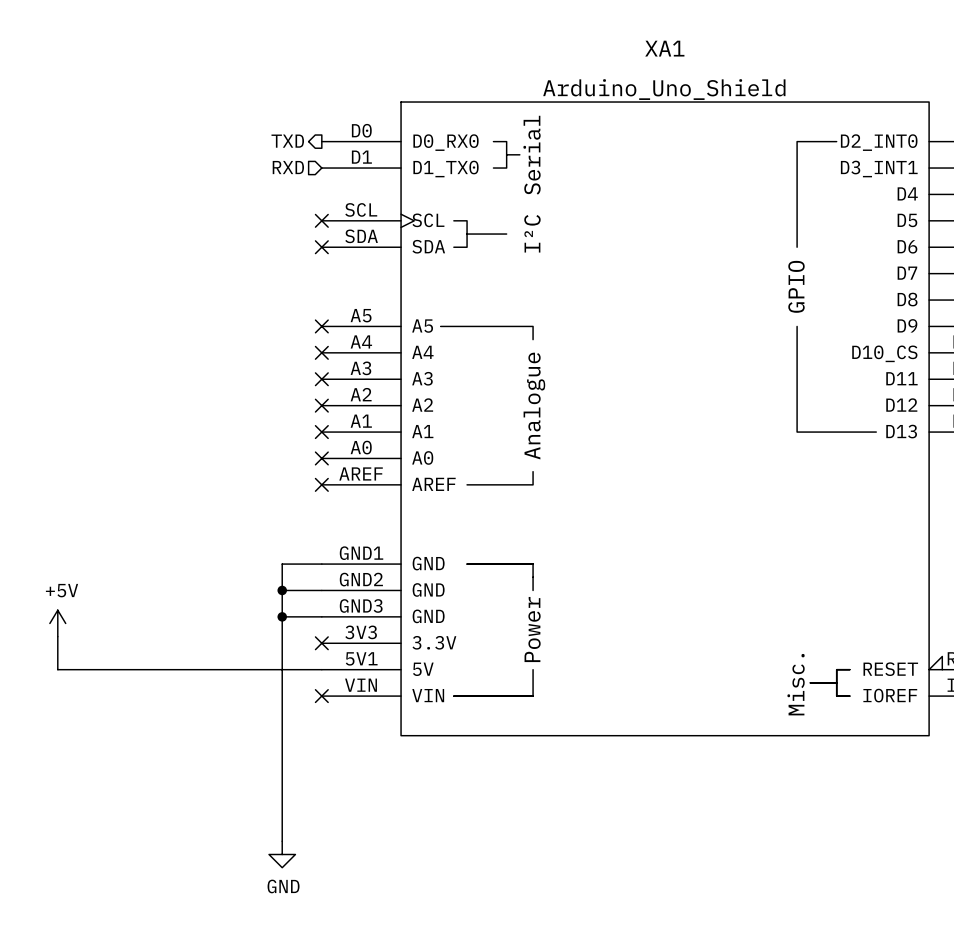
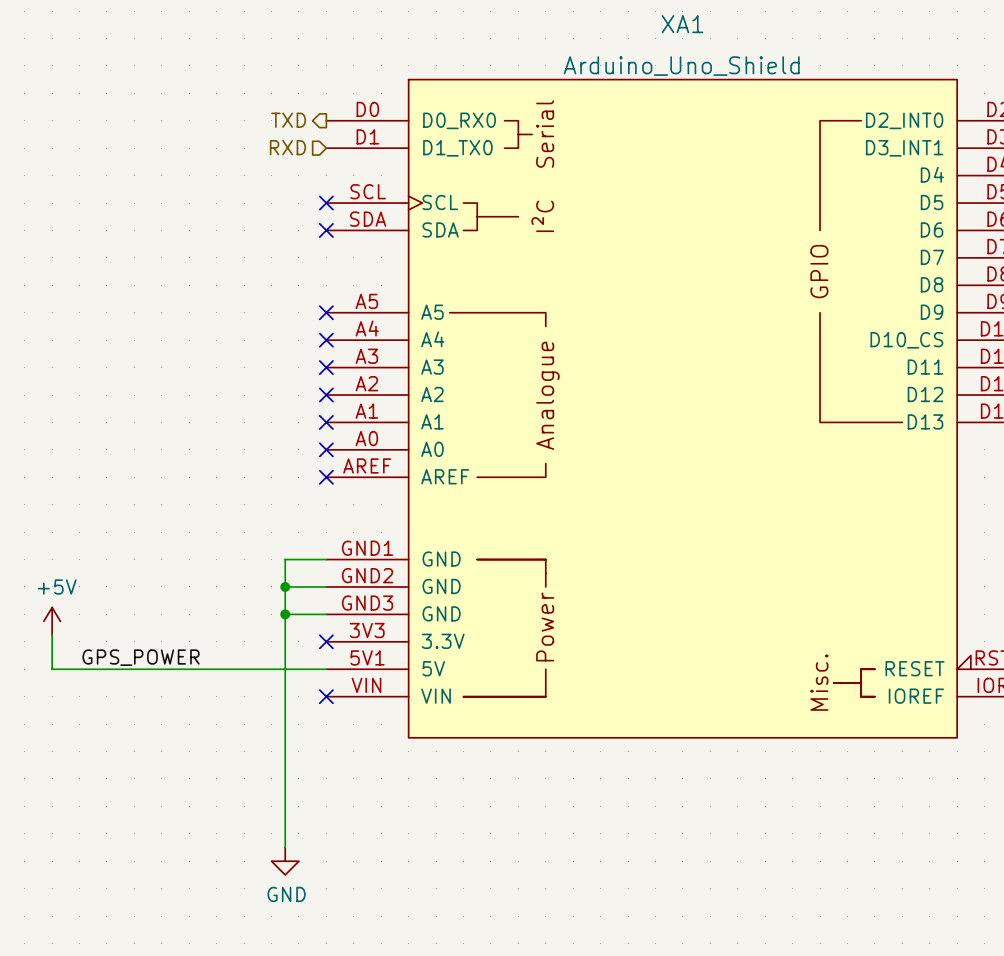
label: none -> GPS_POWER (141, 657)

